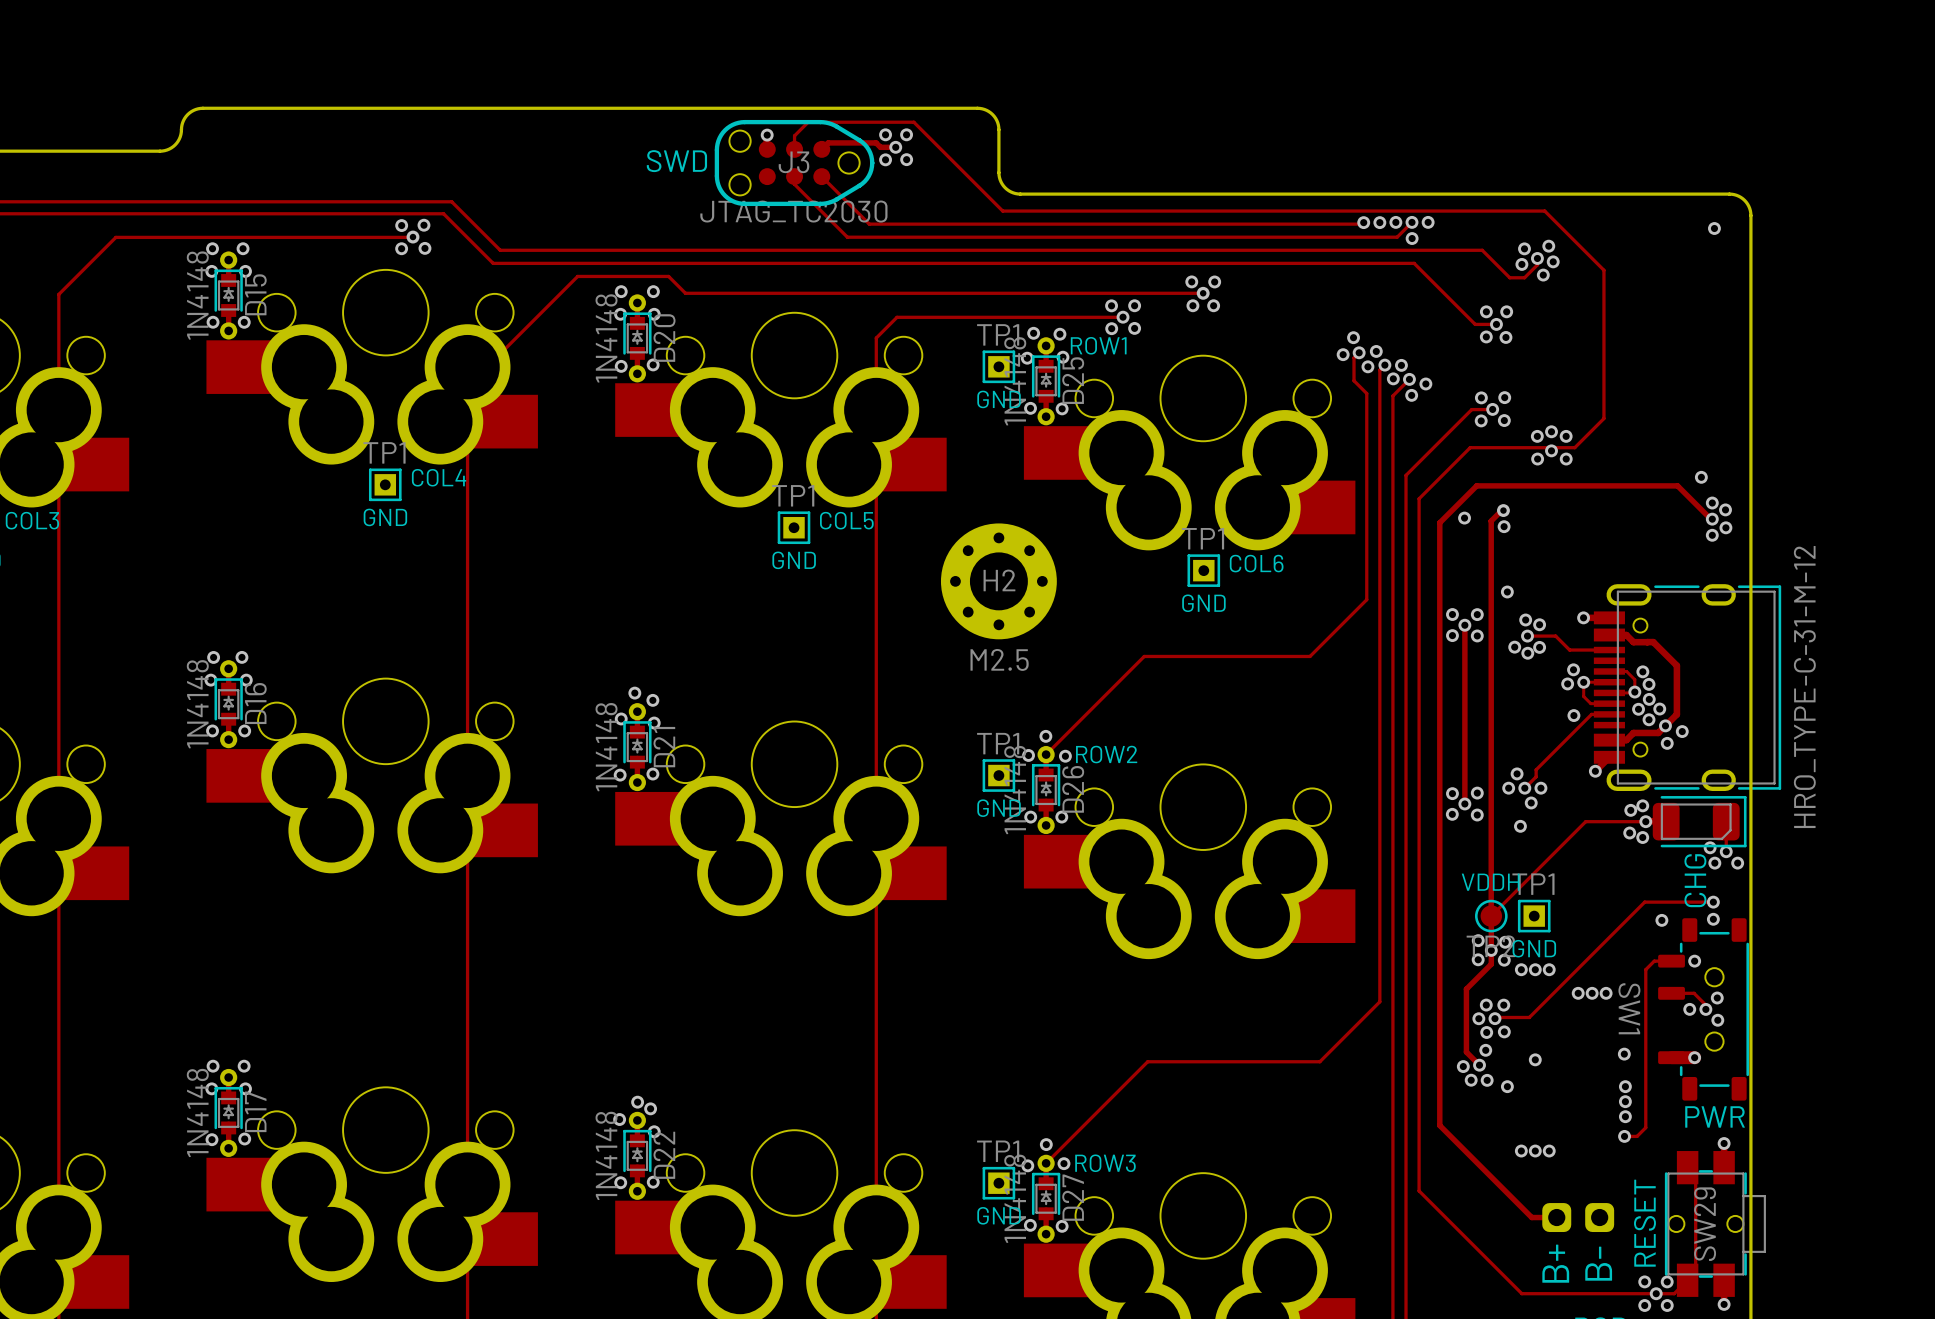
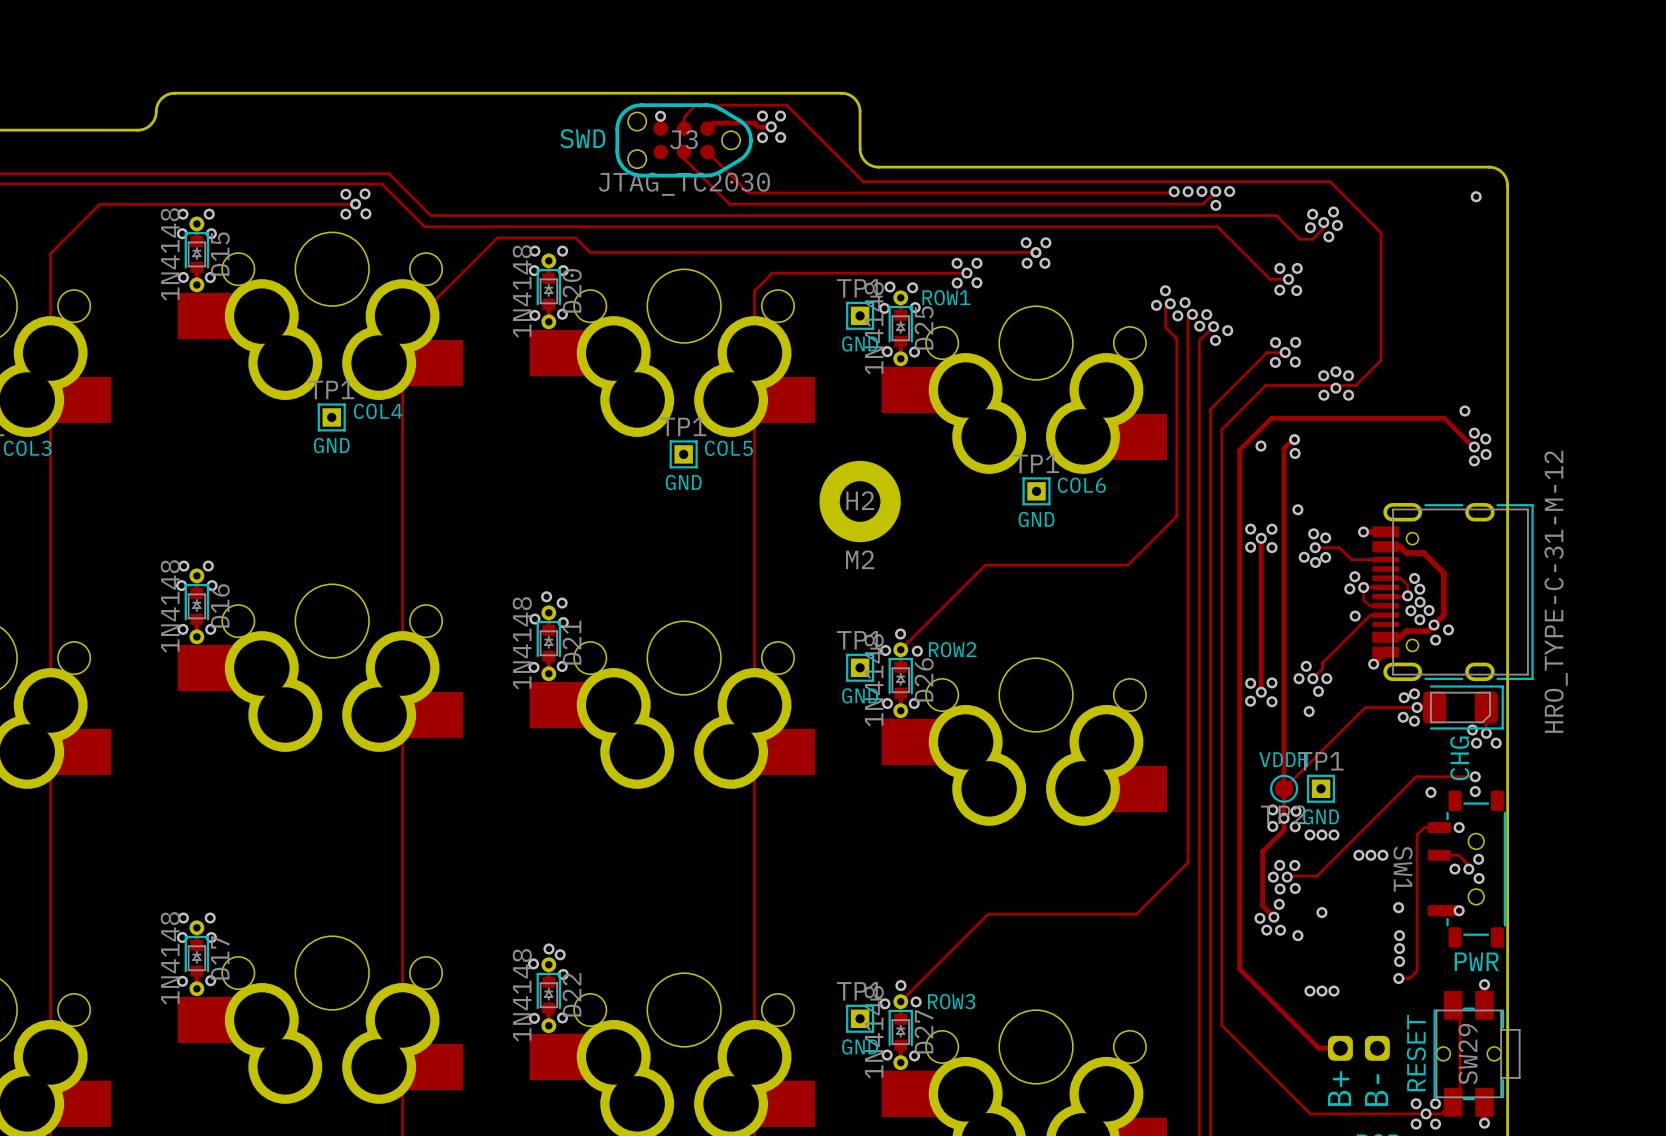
H2 footprint: [940, 523, 1057, 640] -> [819, 460, 901, 543]
H2 value: M2.5 (999, 659) -> M2 (860, 559)

